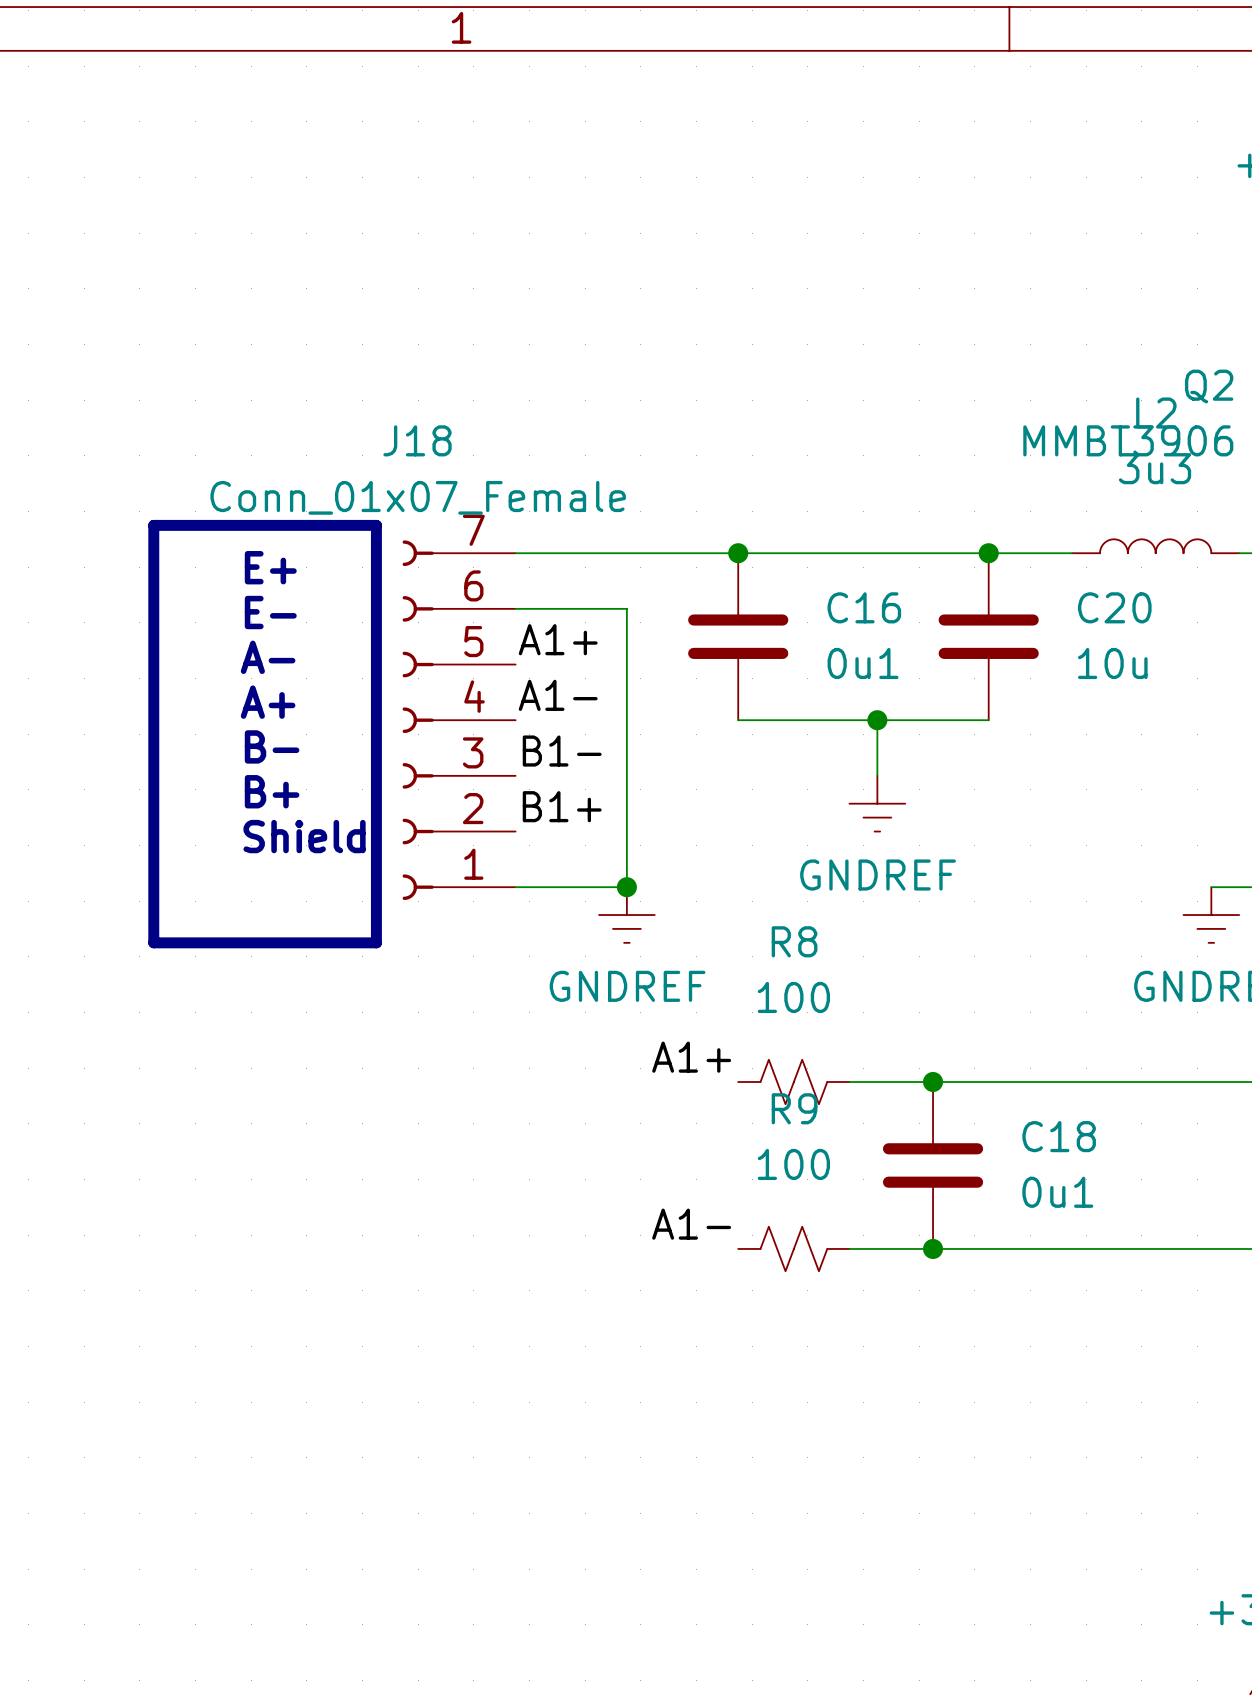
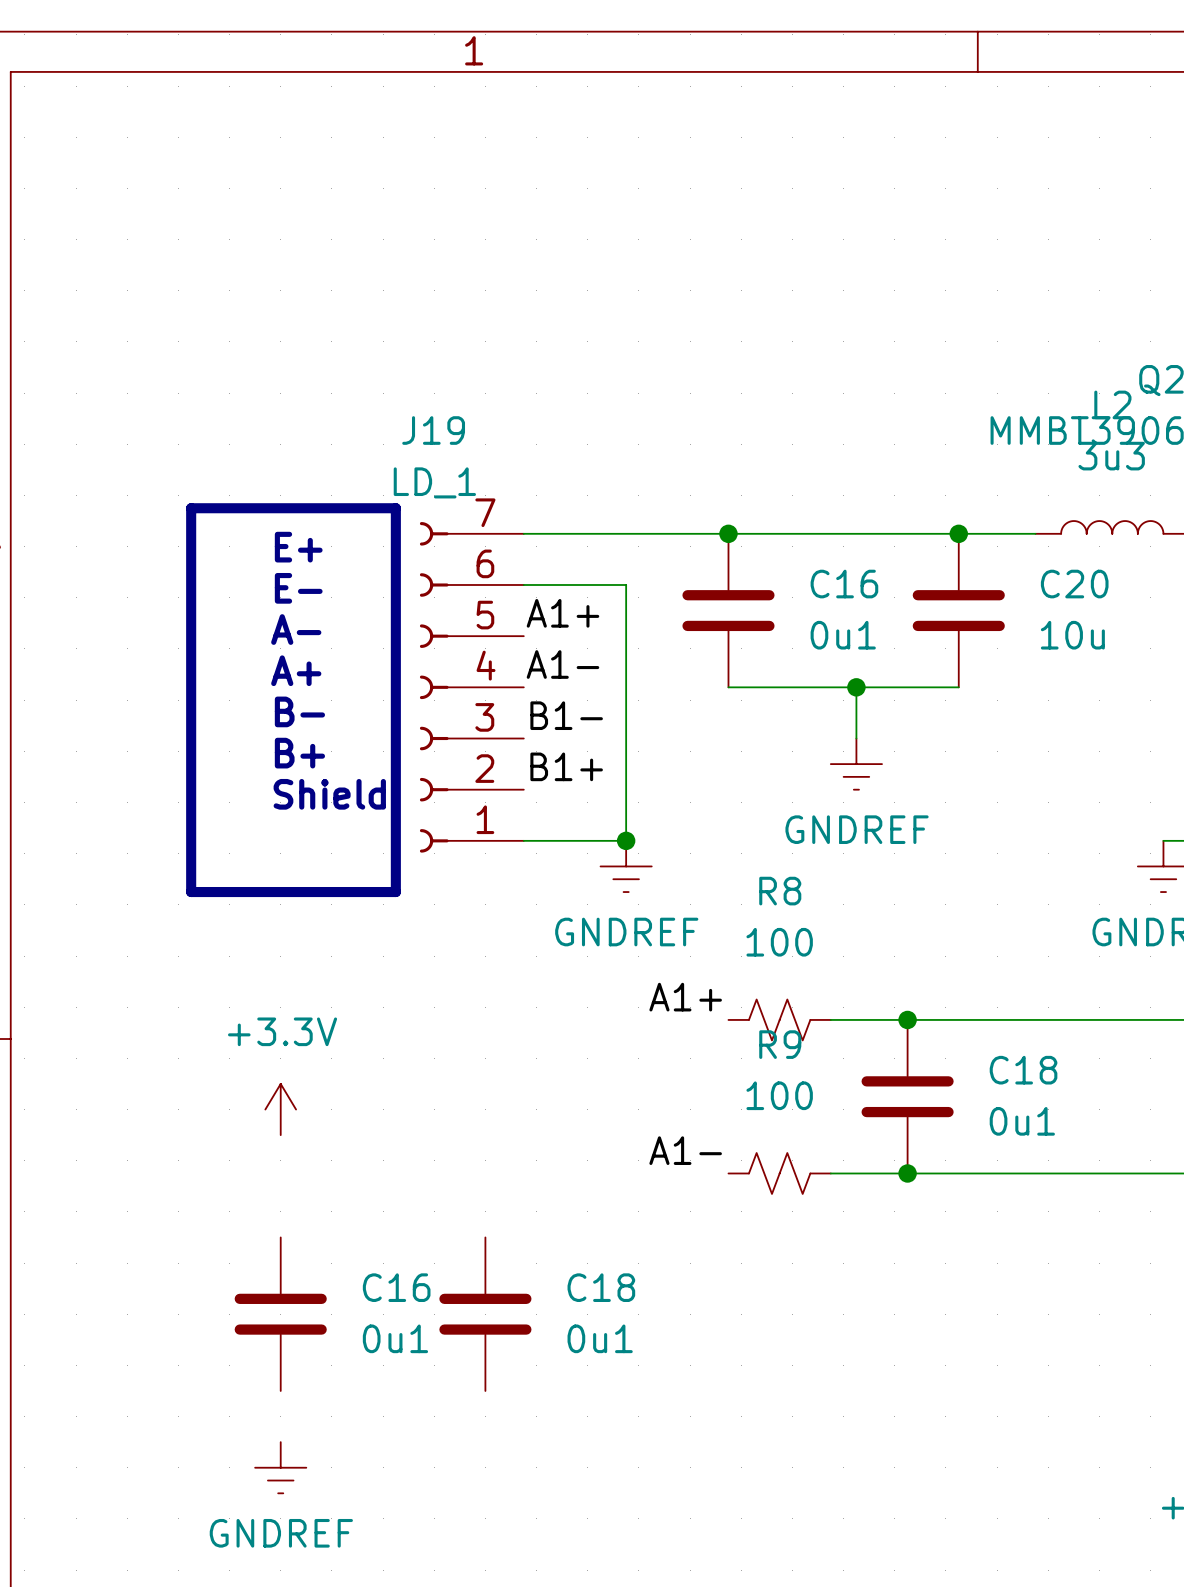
J18 name: J18 (417, 440) -> J19 (433, 430)
J18 value: Conn_01x07_Female (418, 497) -> LD_1 (434, 482)
power symbol: none -> +3.3V (280, 1109)
C16: none -> 0u1 (280, 1314)
C18: none -> 0u1 (485, 1314)
power symbol: none -> GNDREF (280, 1467)

